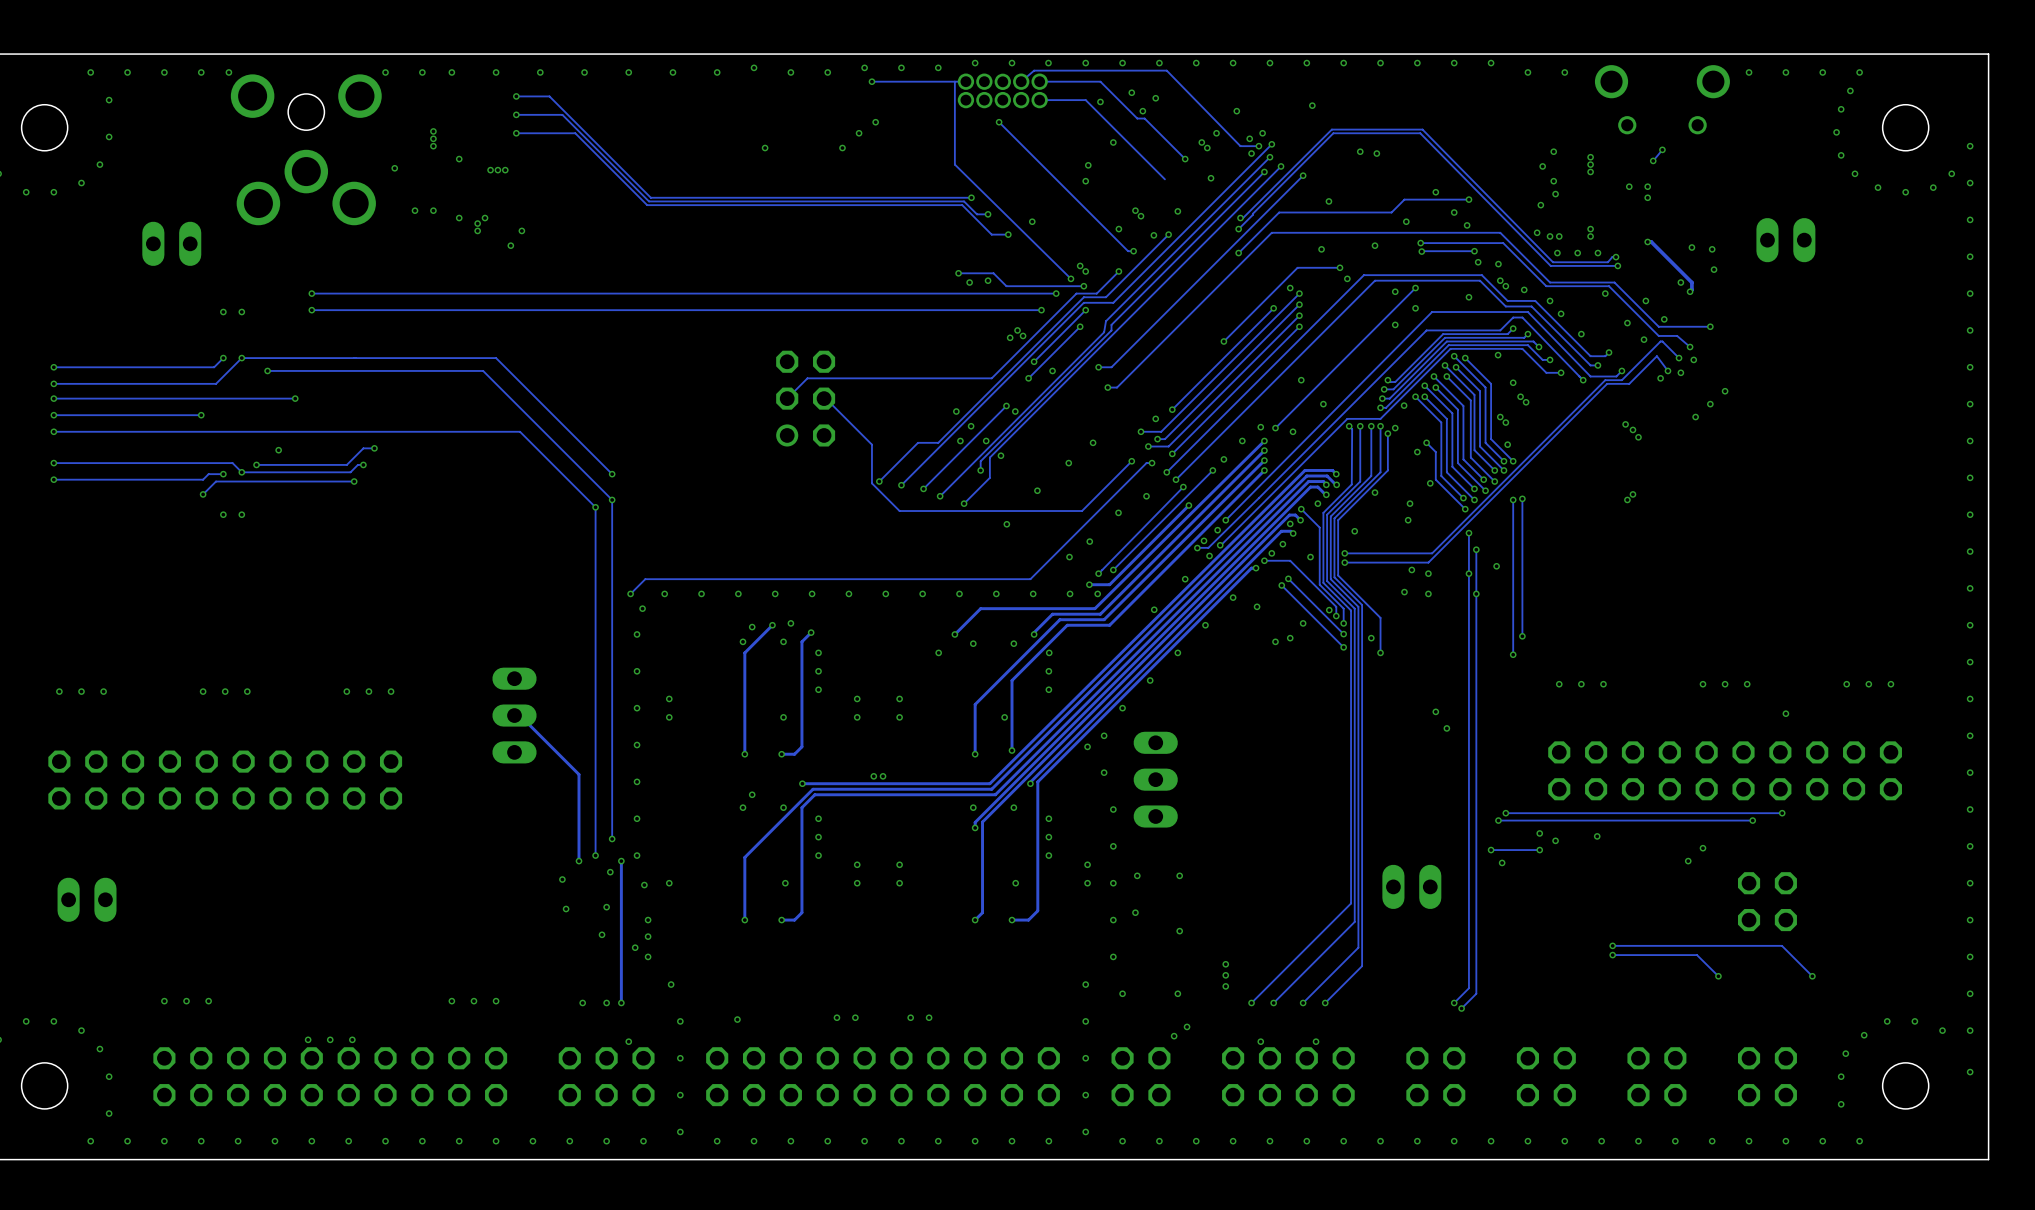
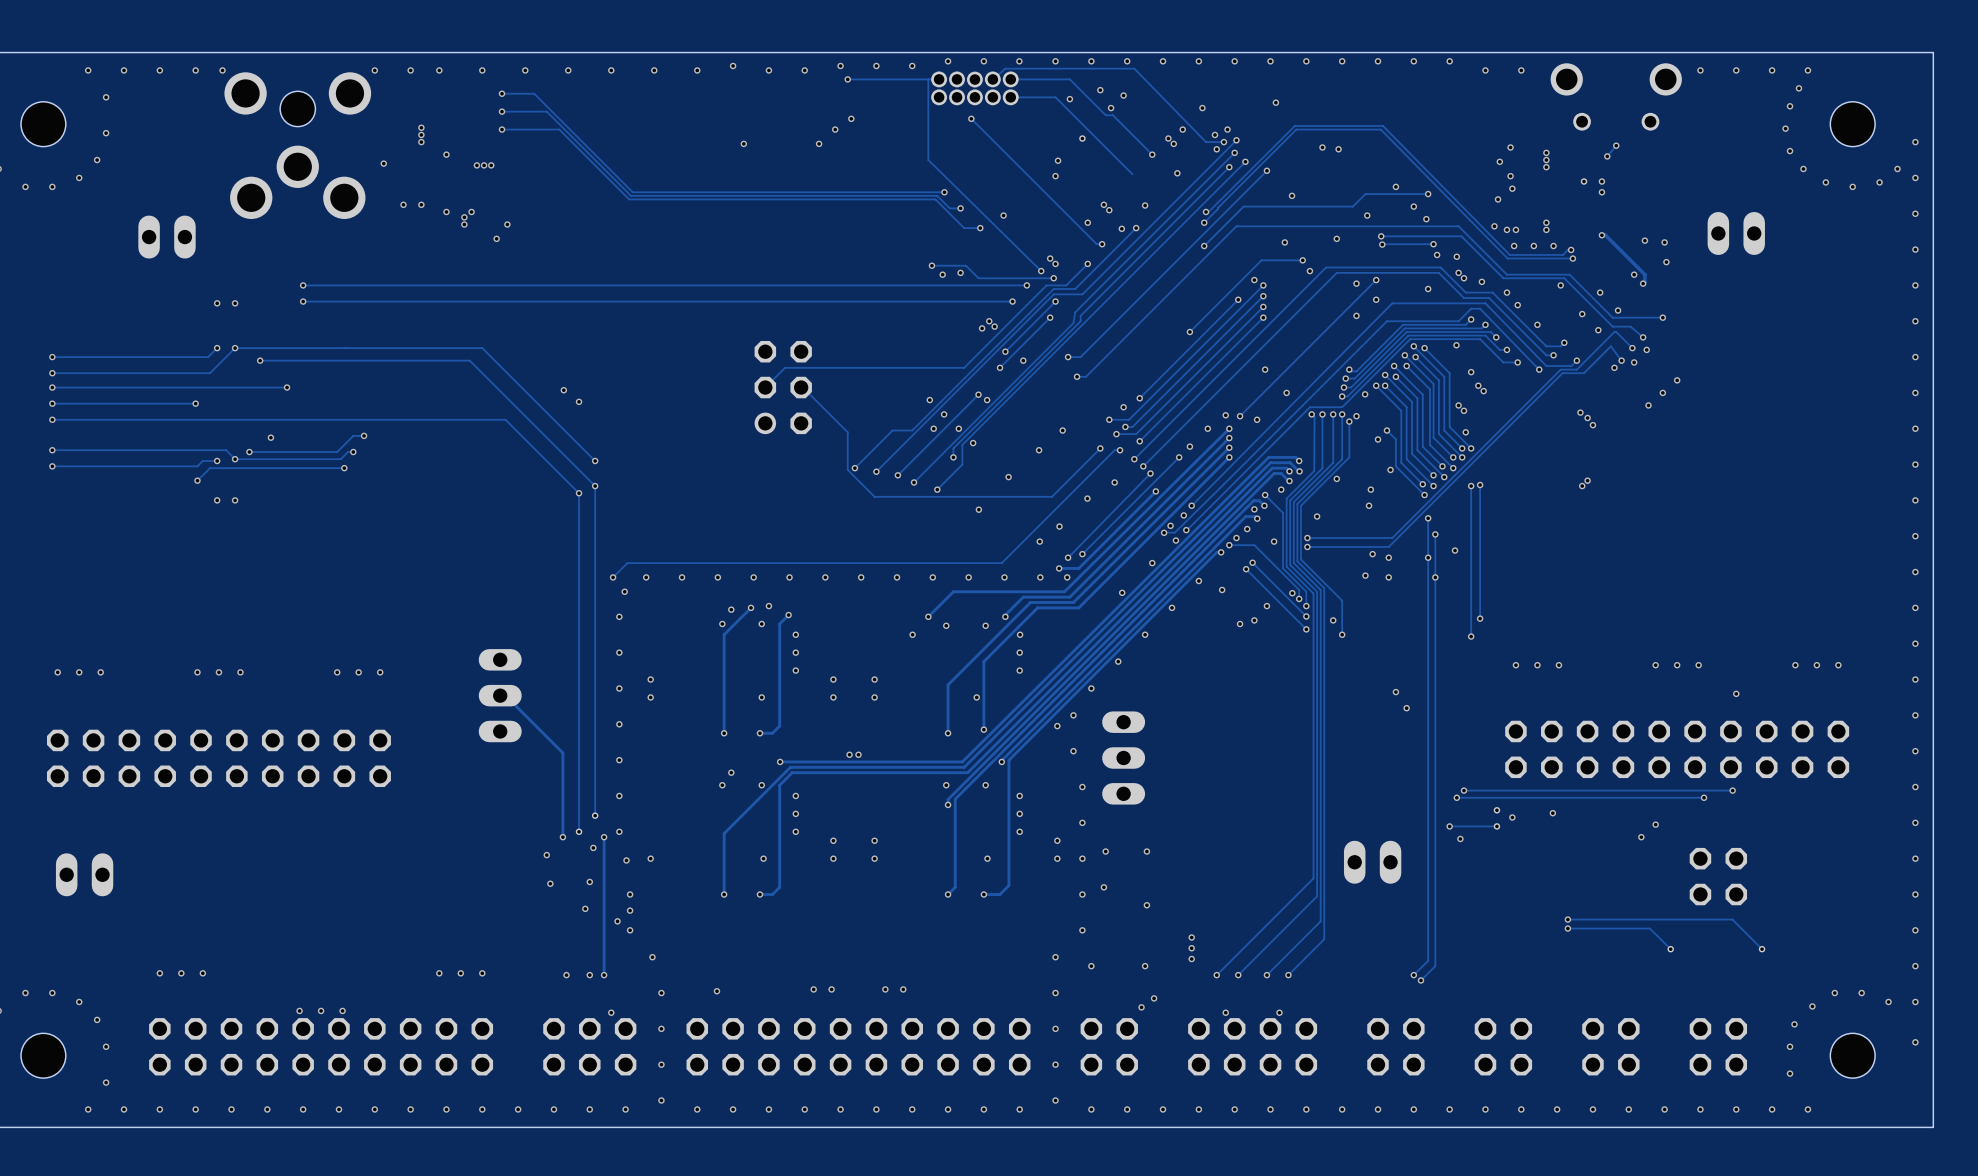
via: none -> (563, 390)
via: none -> (579, 401)

